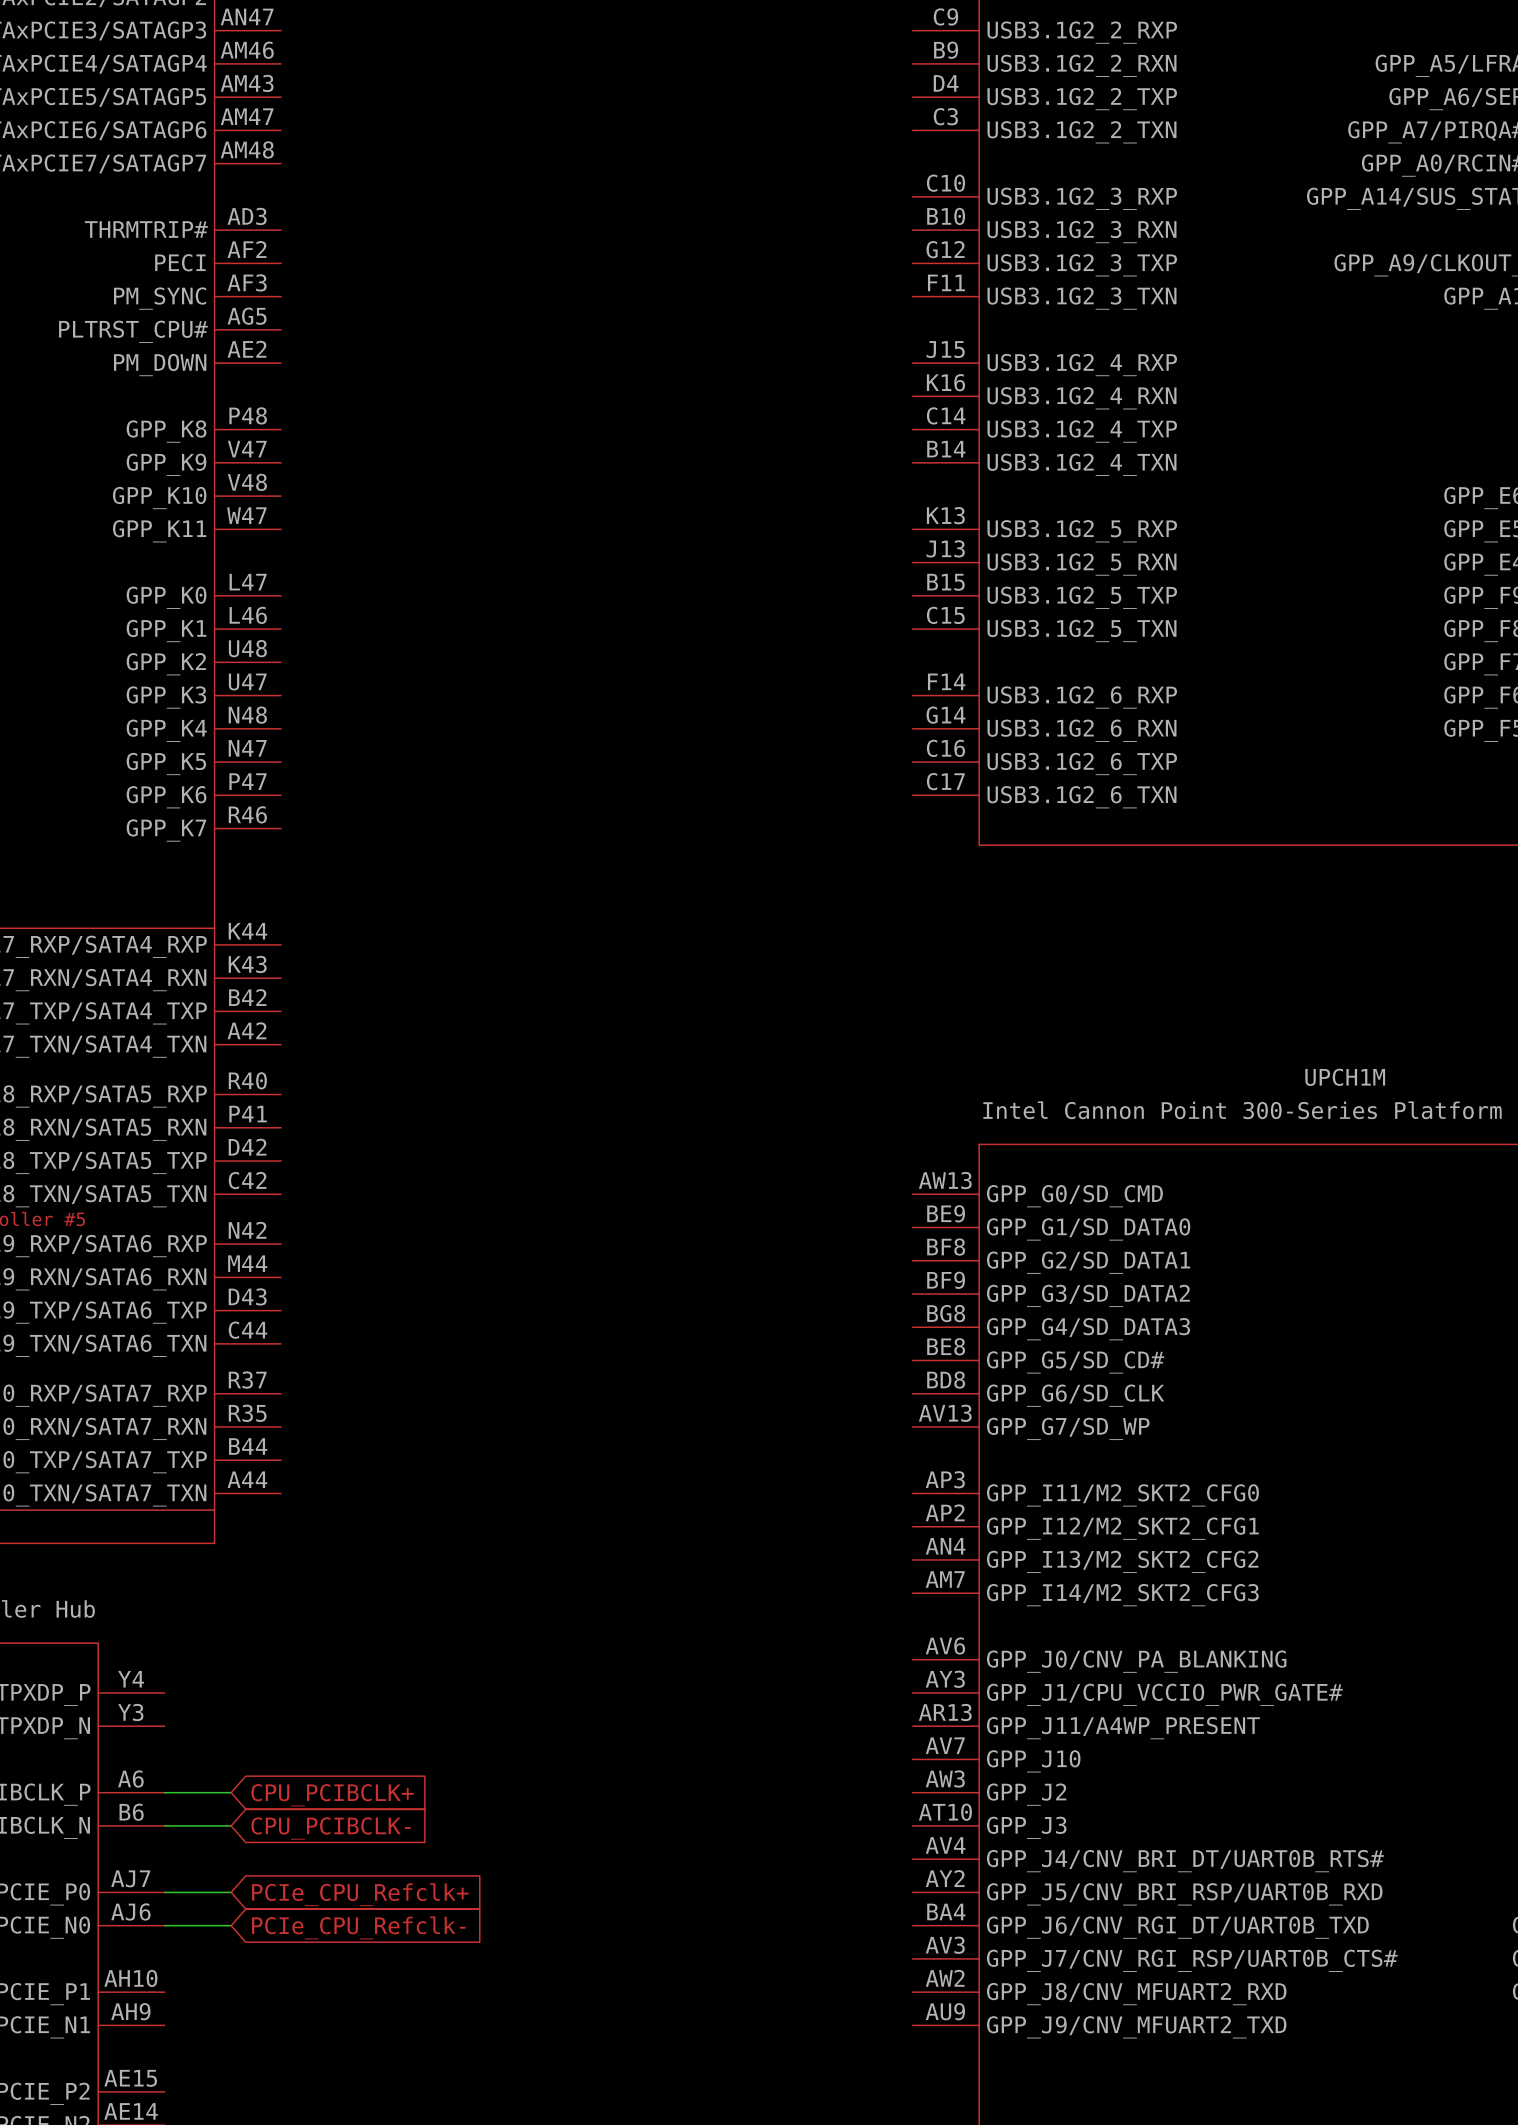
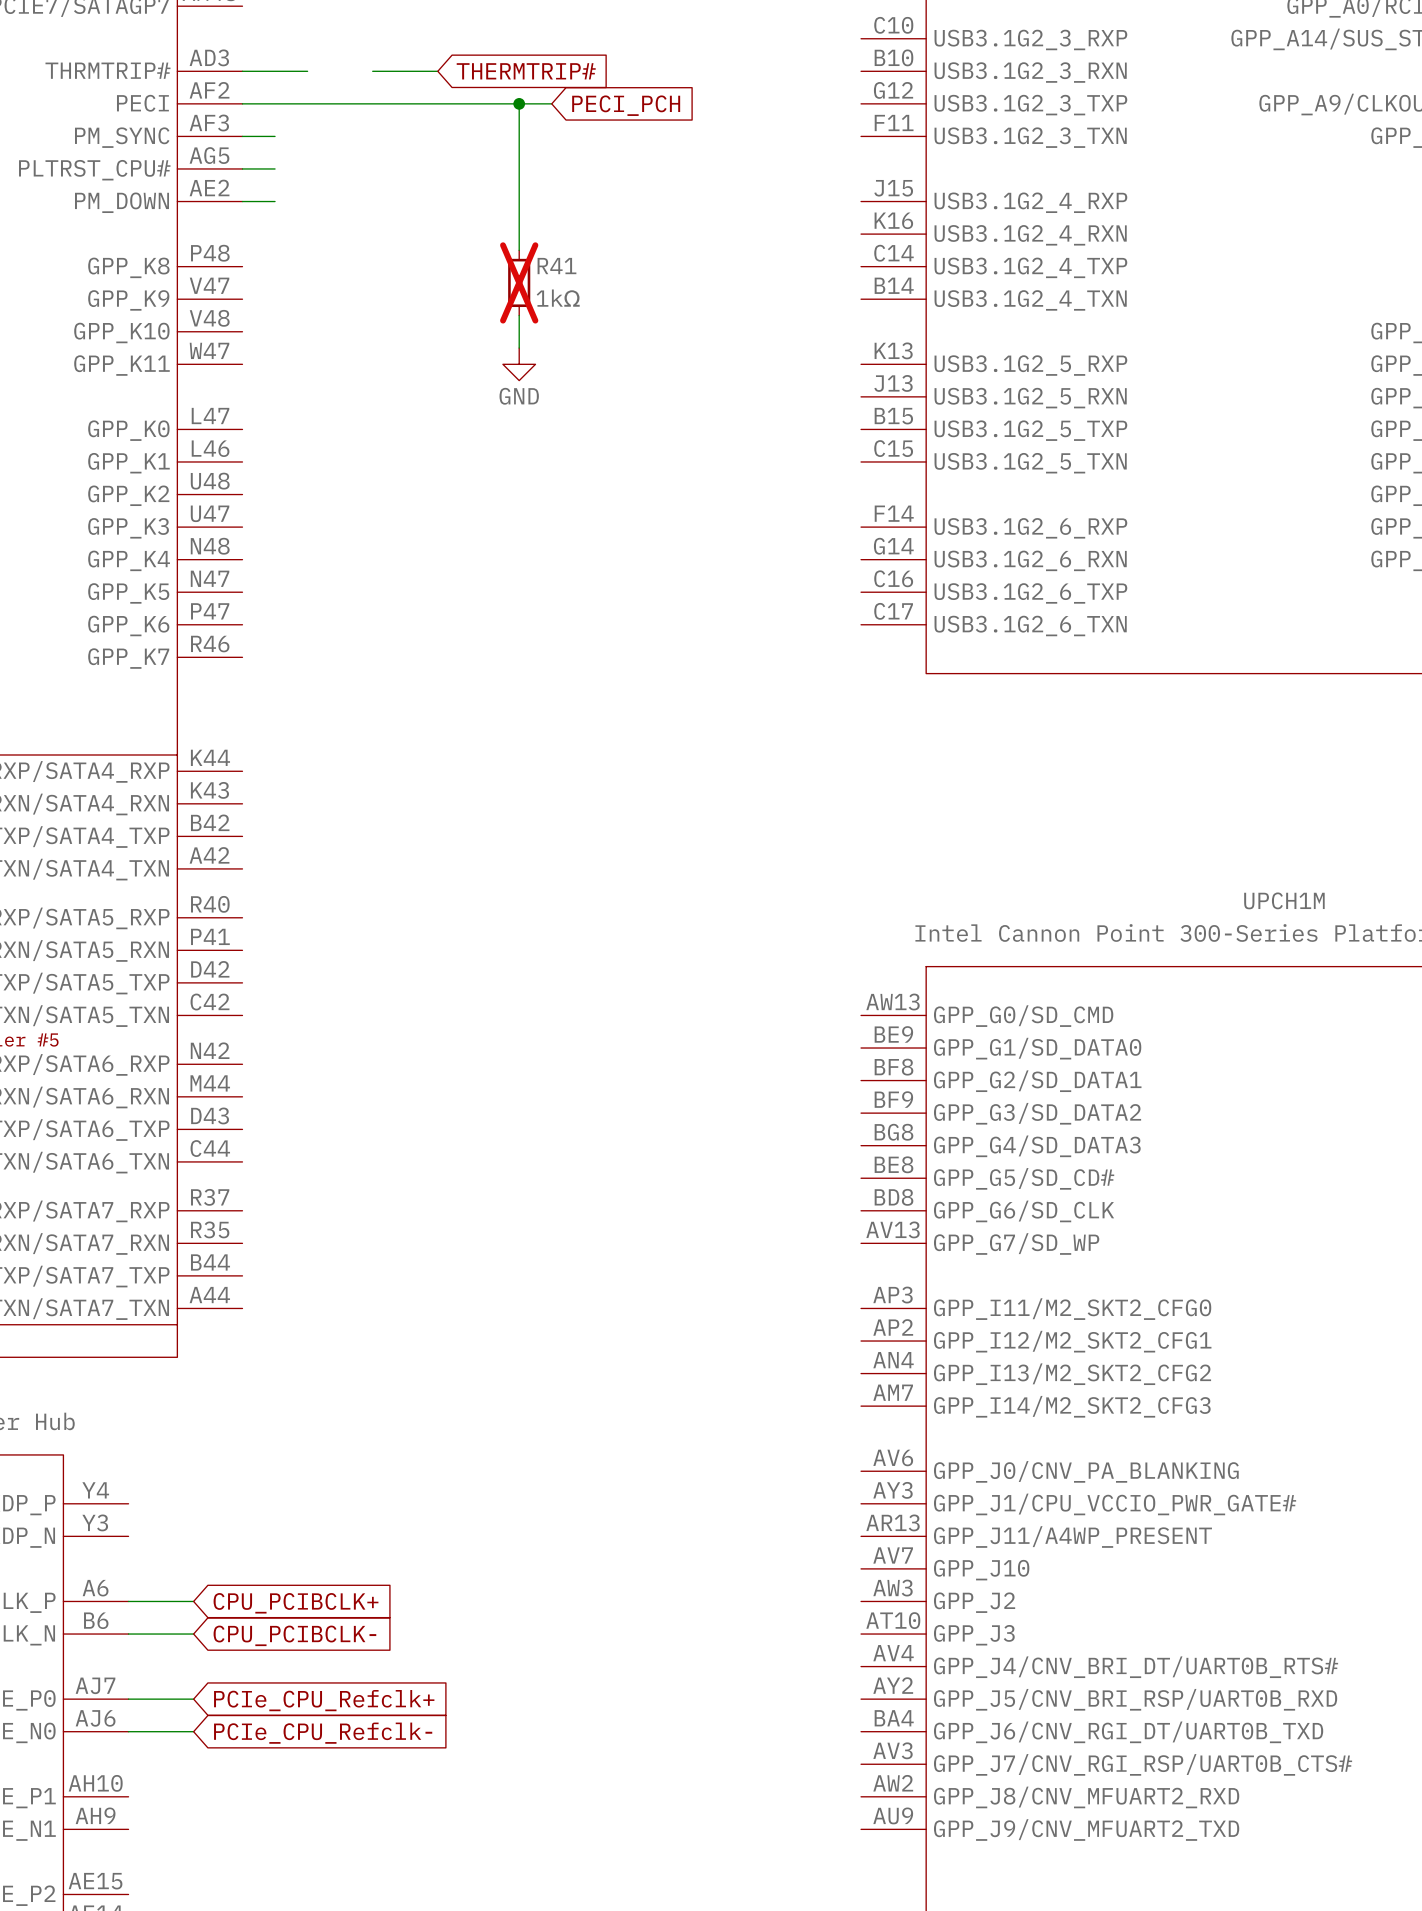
wire: none -> (242, 71) (307, 71)
wire: none -> (372, 71) (437, 71)
global label: none -> THERMTRIP# (526, 71)
wire: none -> (242, 103) (551, 103)
wire: none -> (519, 103) (519, 250)
junction: none -> (519, 103)
global label: none -> PECI_PCH (626, 105)
wire: none -> (242, 136) (275, 136)
wire: none -> (242, 168) (275, 168)
wire: none -> (242, 201) (275, 201)
R41: none -> 1kΩ (519, 282)
wire: none -> (519, 315) (519, 348)
power symbol: none -> GND (519, 364)

